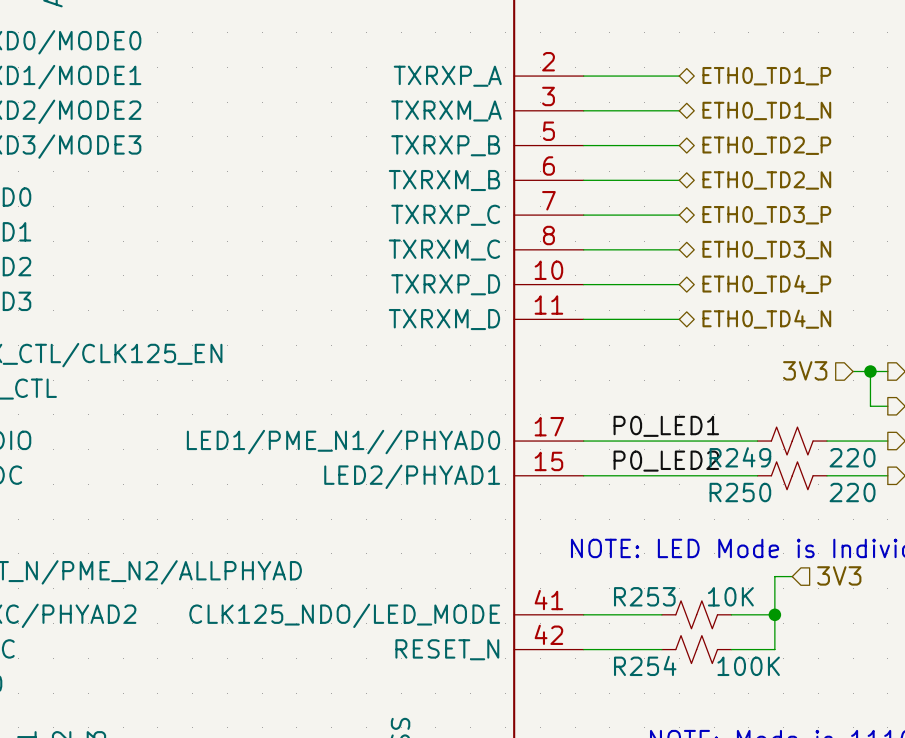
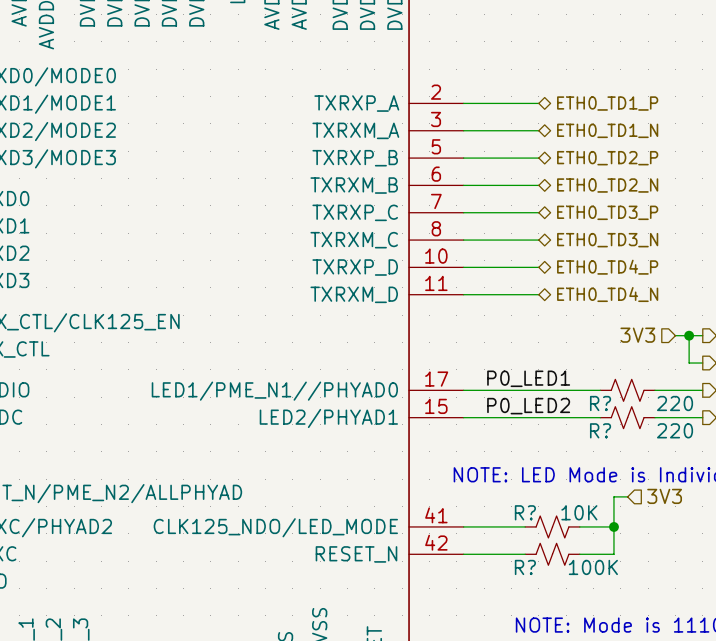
R249 name: R249 (740, 457) -> R? (600, 403)
R250 name: R250 (740, 492) -> R? (600, 430)
R253 name: R253 (644, 596) -> R? (525, 512)
R254 name: R254 (645, 665) -> R? (525, 567)

